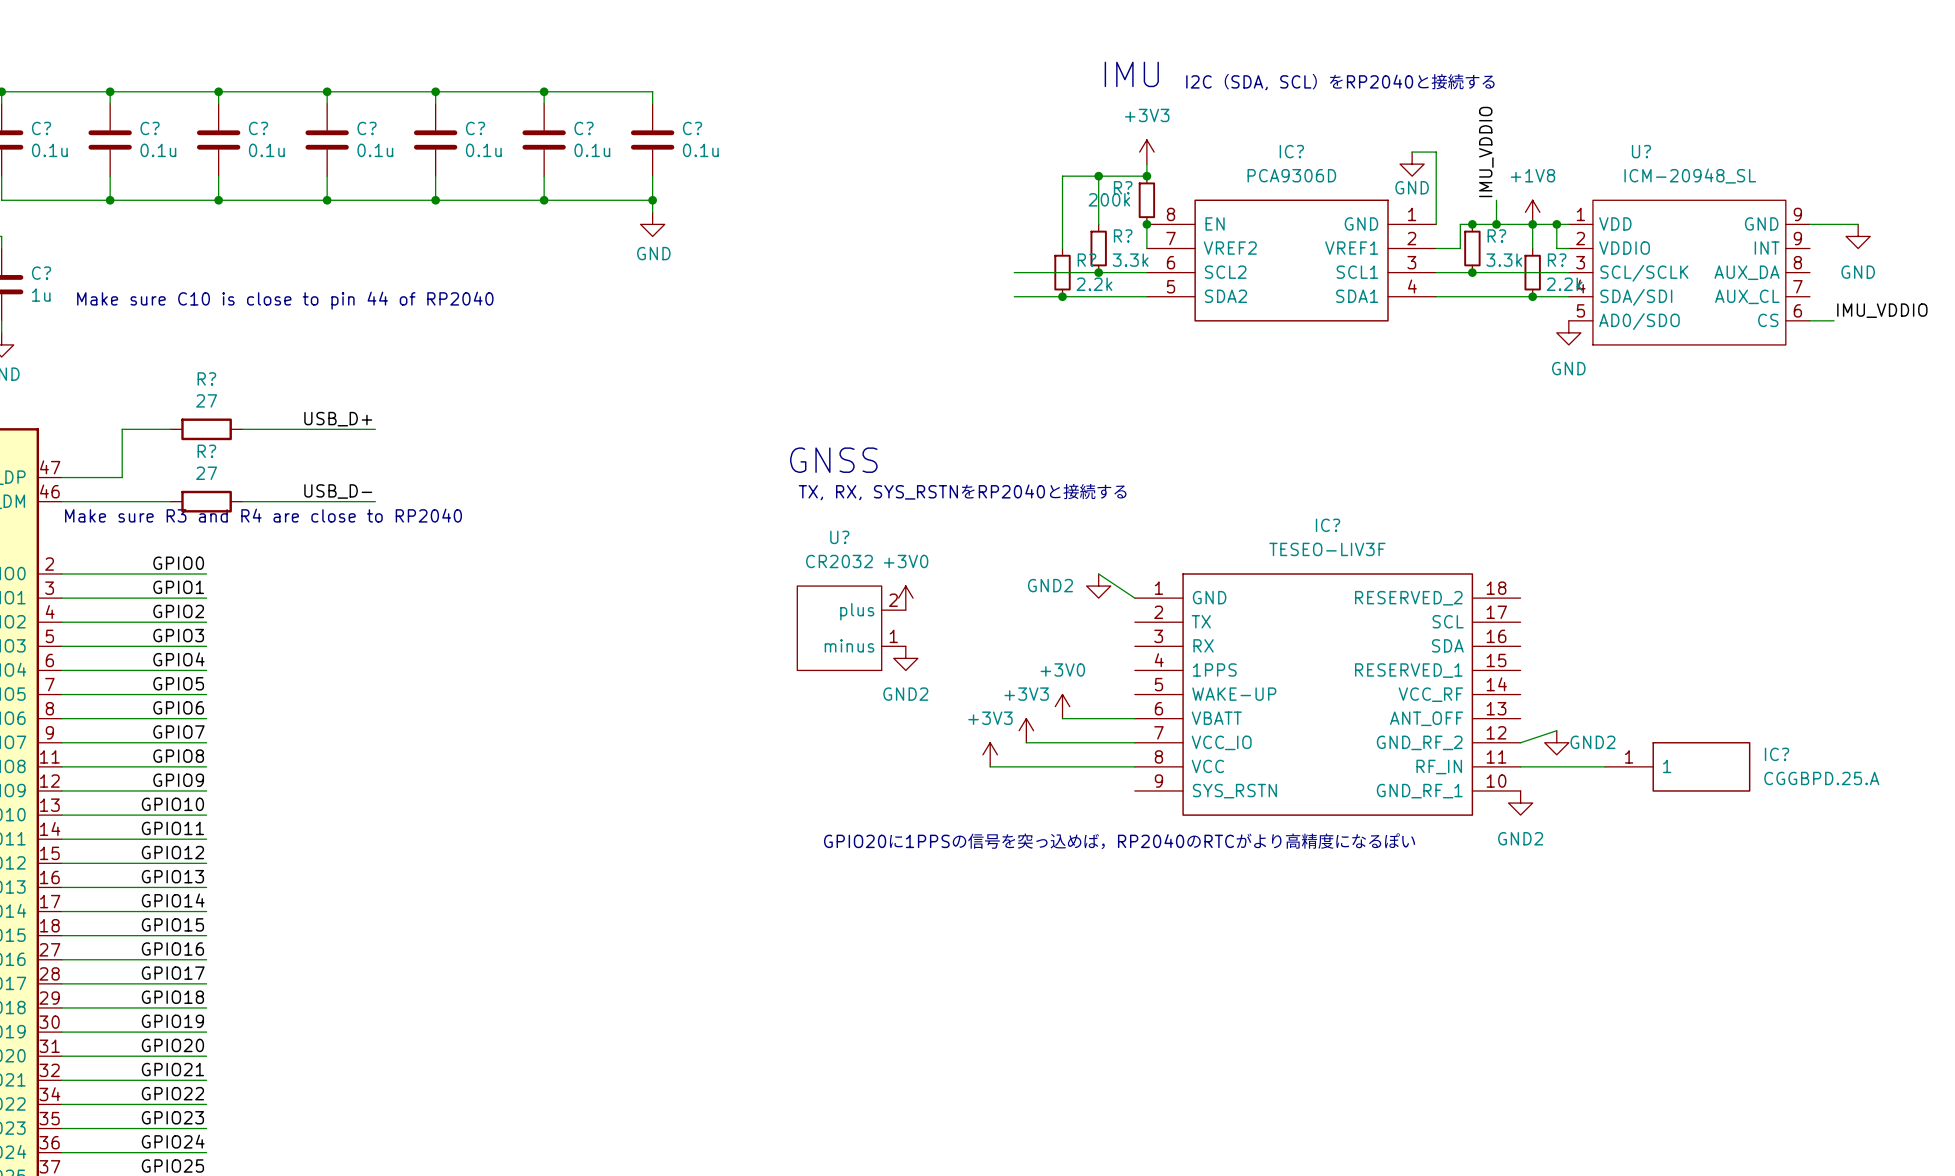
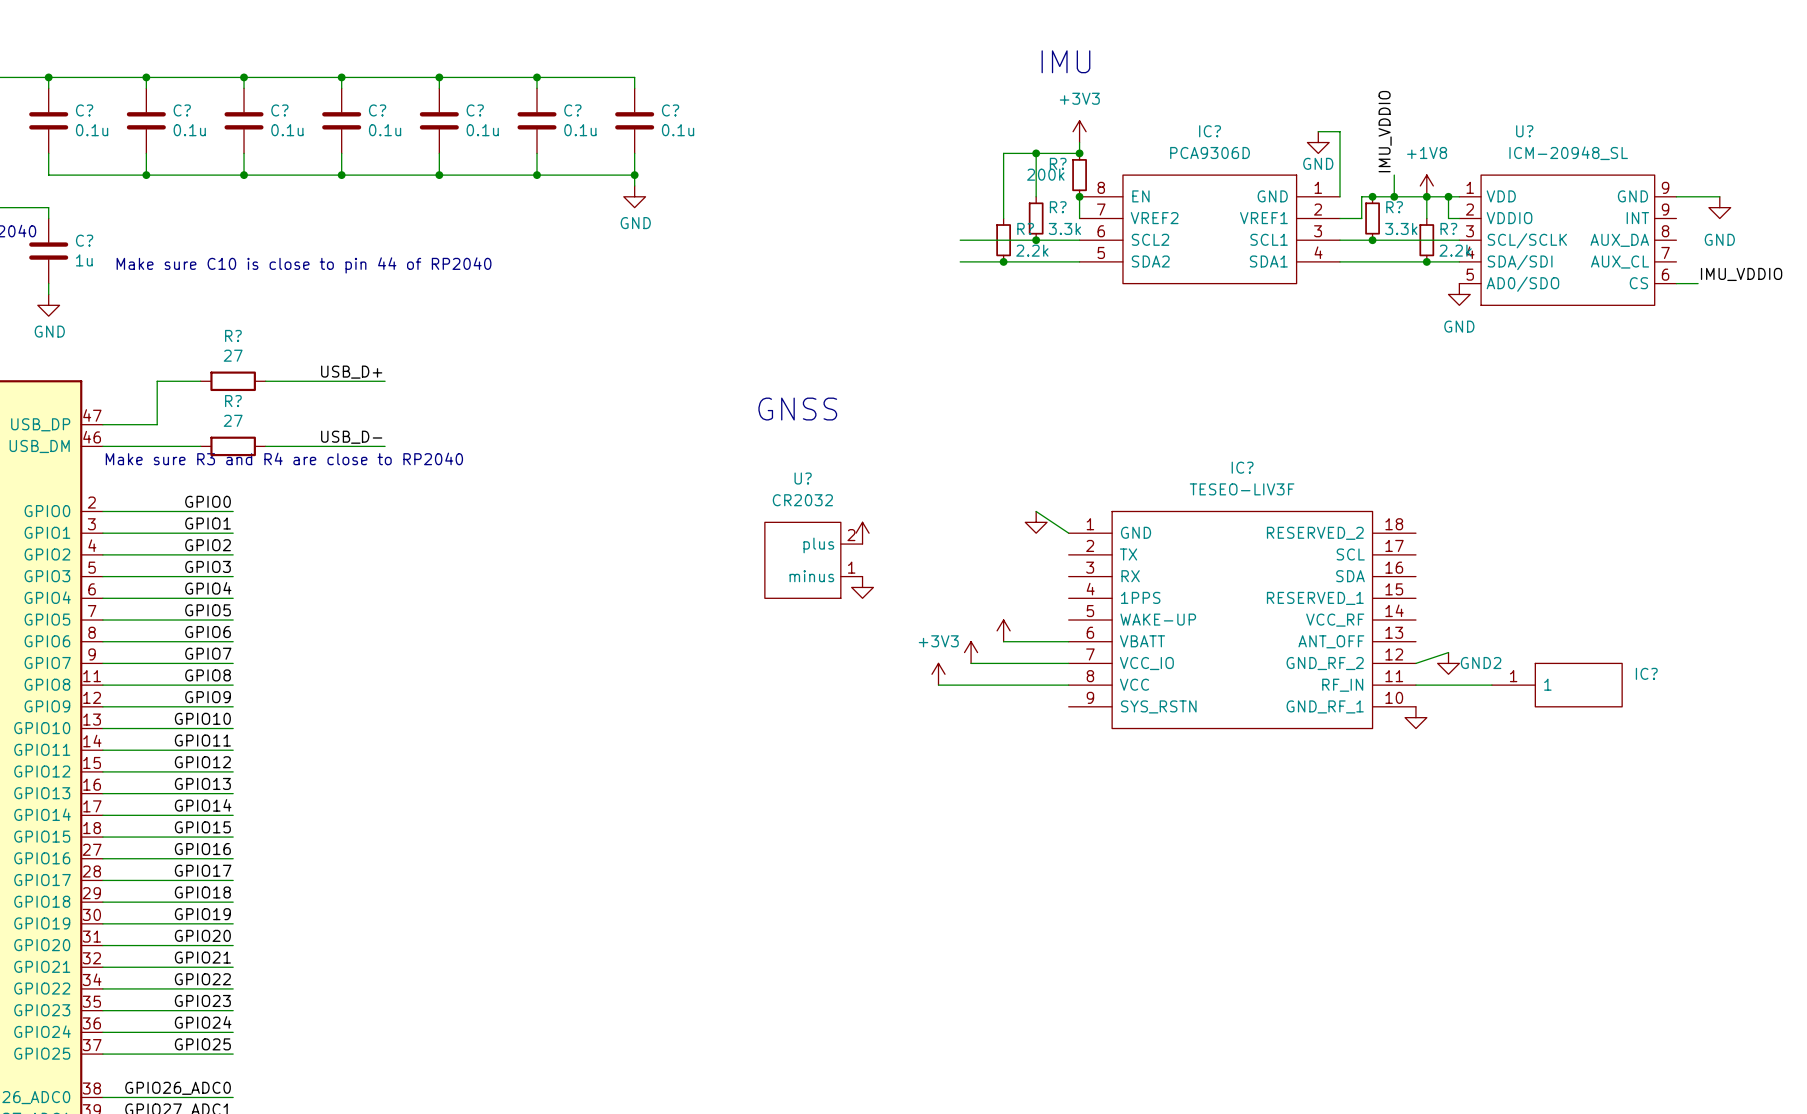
text: I2C（SDA, SCL）をRP2040と接続する (1340, 81) -> none
text: TX, RX, SYS_RSTNをRP2040と接続する (962, 491) -> none
power symbol text: +3V0 (906, 561) -> none
power symbol text: GND2 (1050, 585) -> none
power symbol text: +3V0 (1062, 669) -> none
power symbol text: GND2 (905, 694) -> none
power symbol text: +3V3 (1026, 694) -> none
IC? value: CGGBPD.25.A (1821, 778) -> none
power symbol text: GND2 (1520, 838) -> none
text: GPIO20に1PPSの信号を突っ込めば，RP2040のRTCがより高精度になるぽい (1119, 841) -> none

